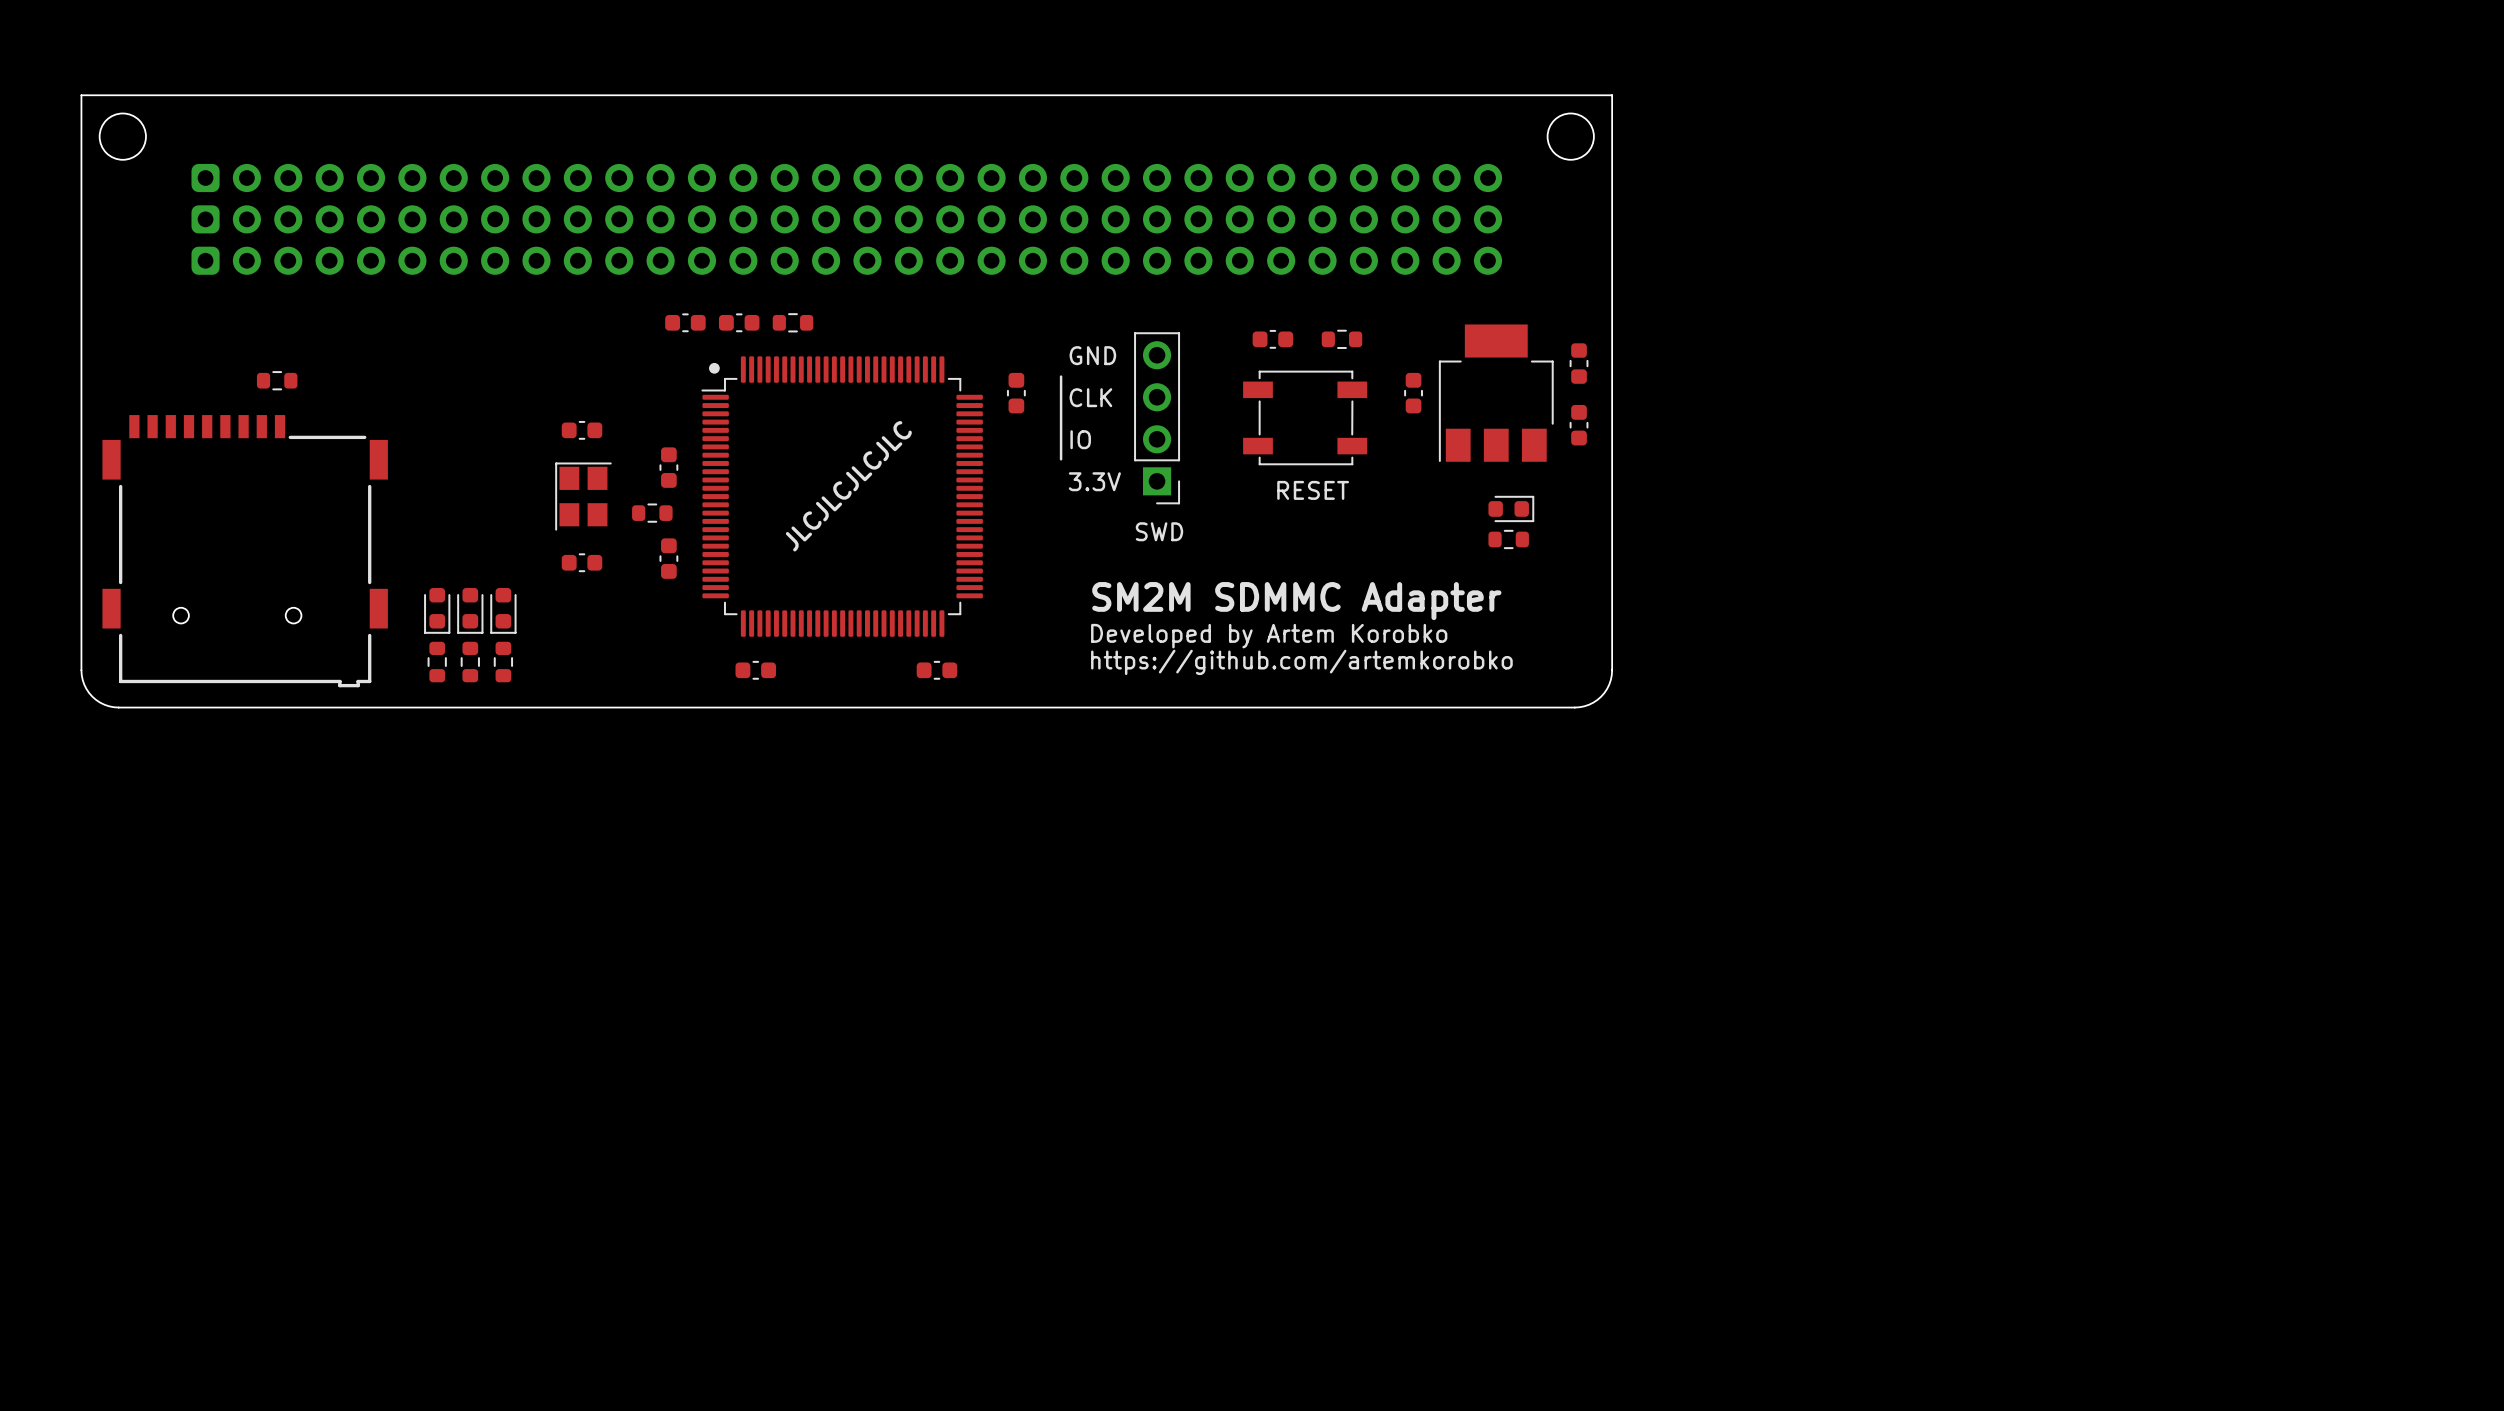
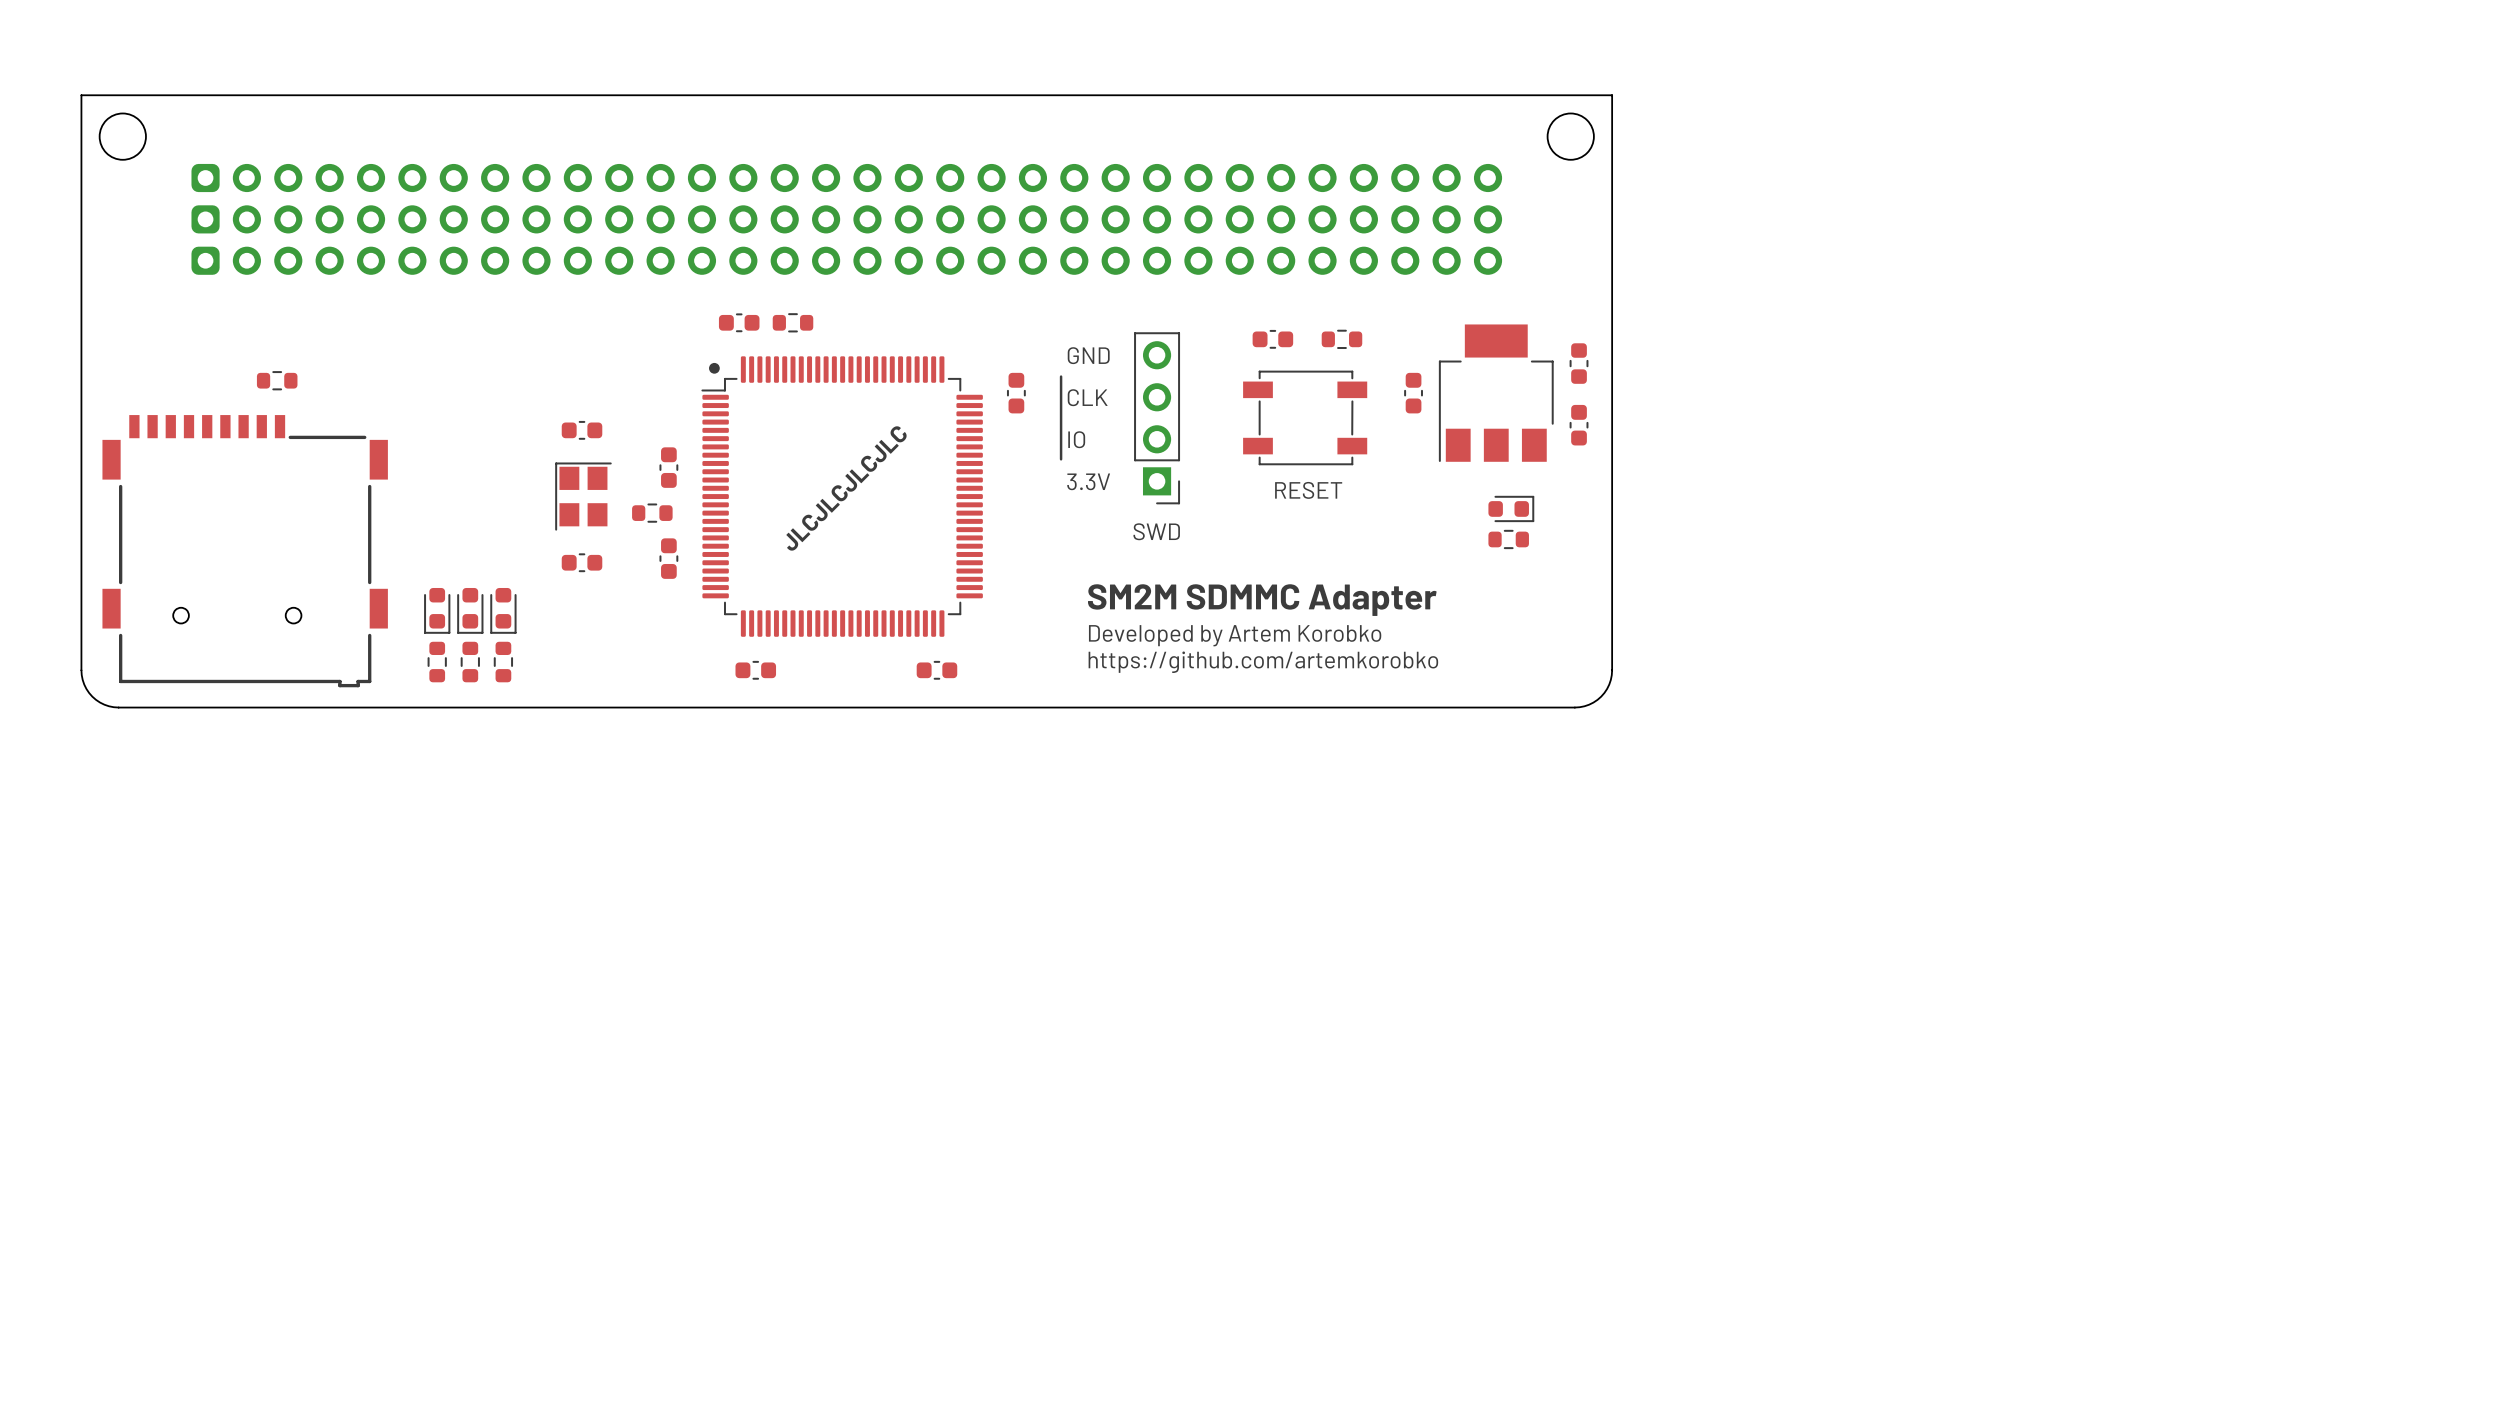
part: (685, 322) -> none

